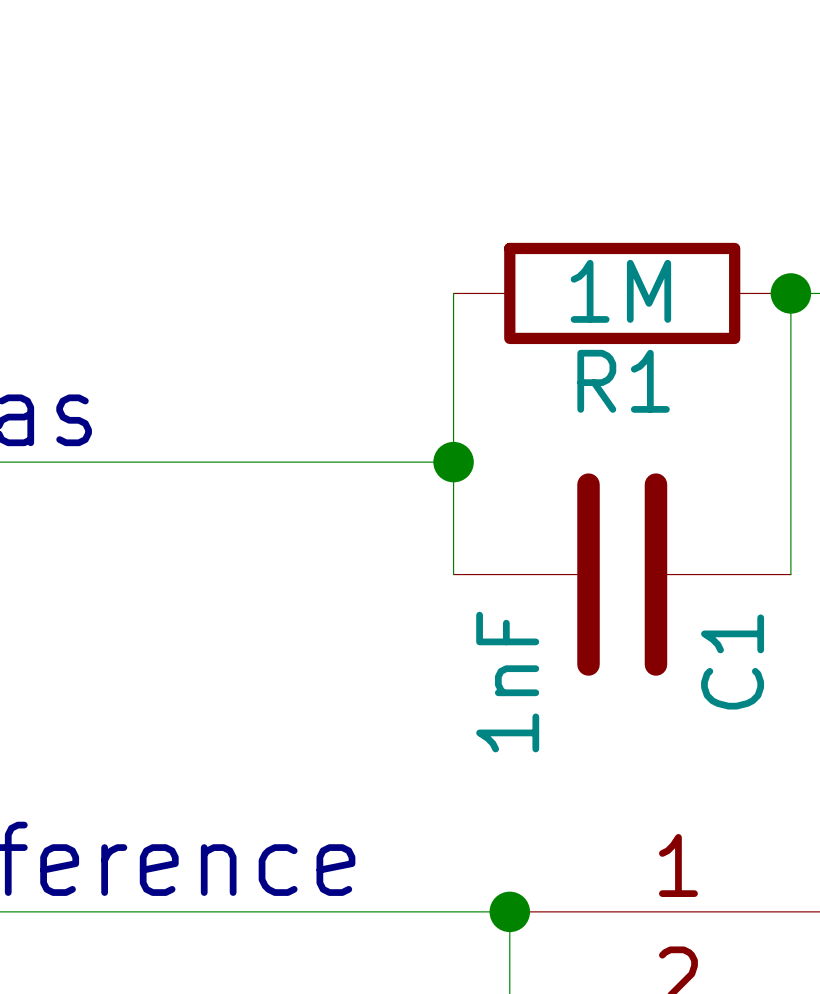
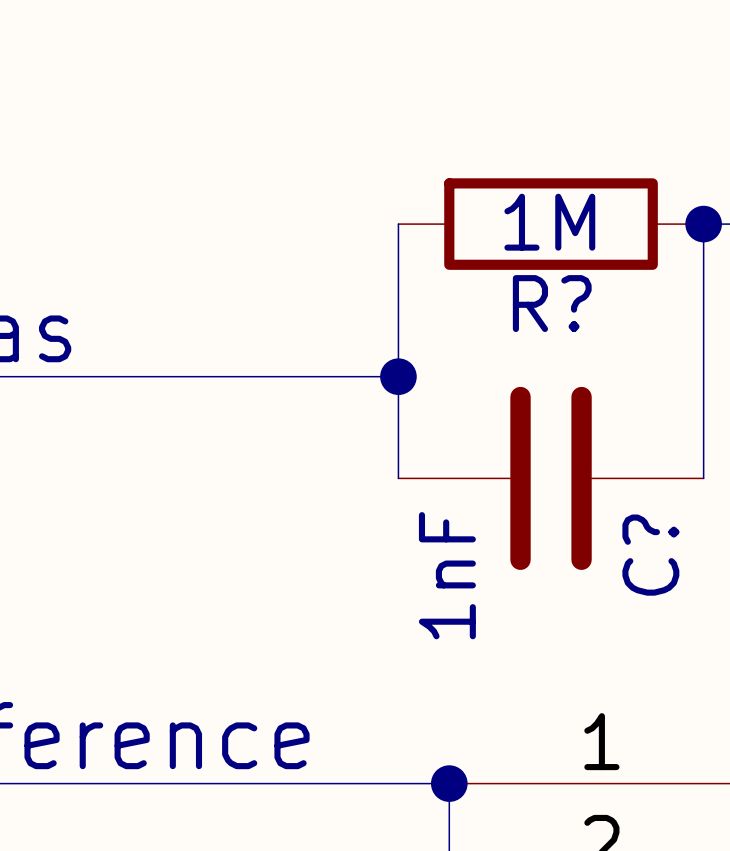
R1 name: R1 (623, 381) -> R? (552, 303)
C1 name: C1 (732, 661) -> C? (650, 555)

